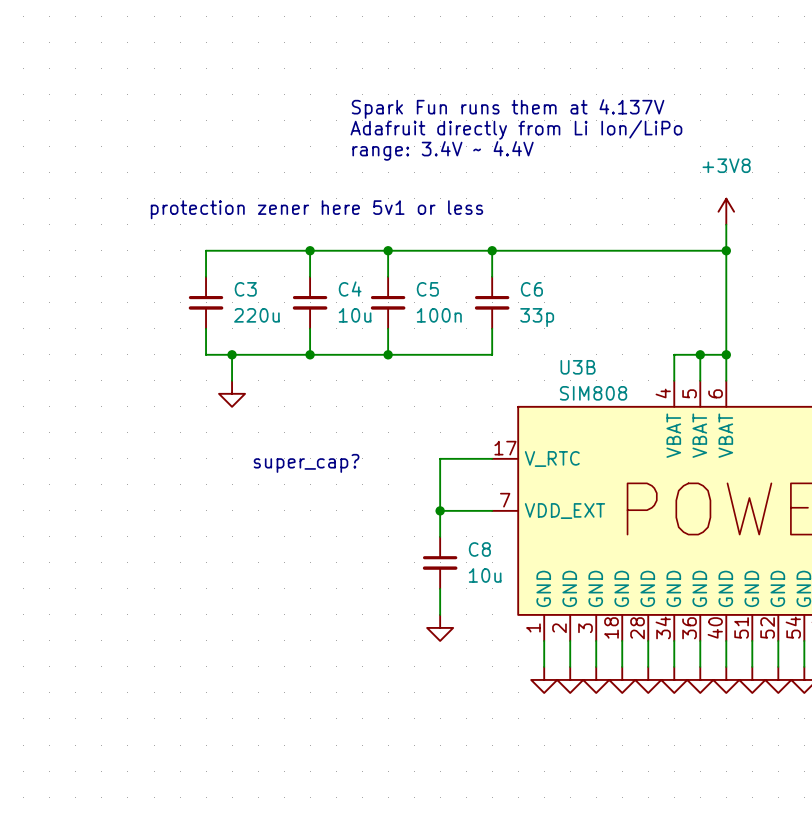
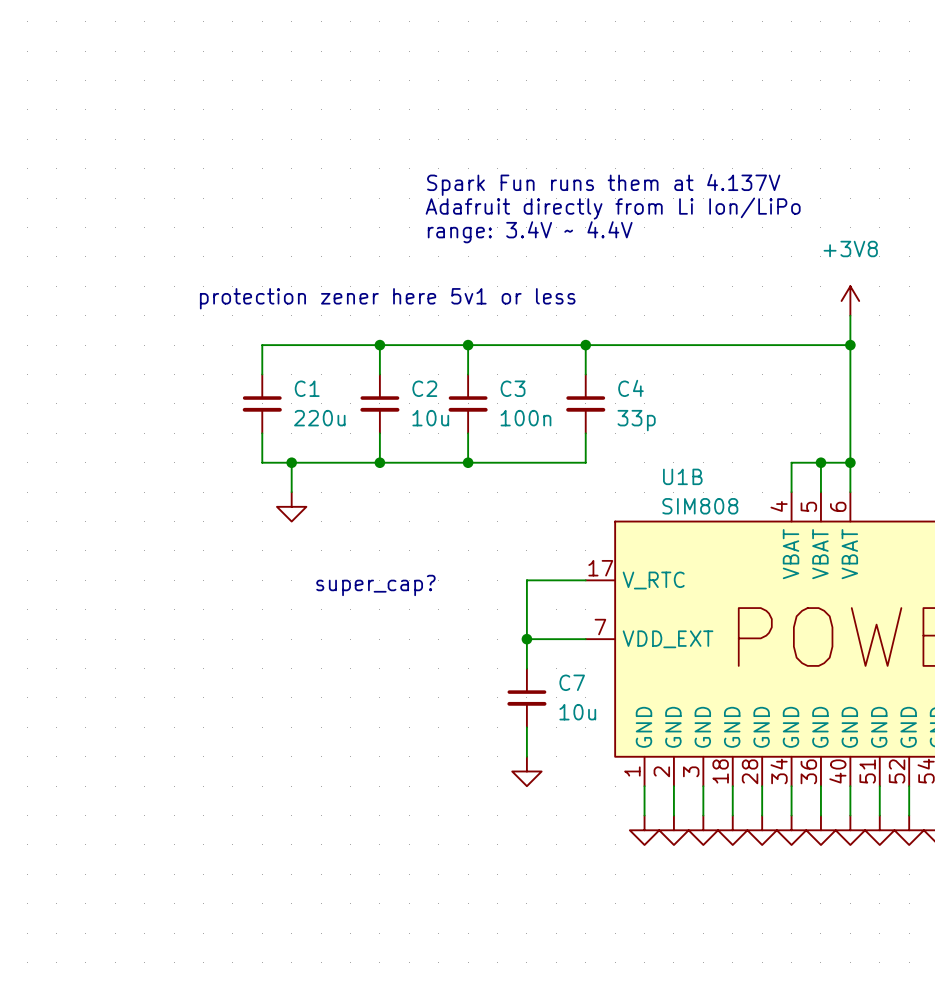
C3 name: C3 (245, 289) -> C1 (307, 388)
C4 name: C4 (350, 289) -> C2 (424, 388)
C5 name: C5 (427, 289) -> C3 (513, 388)
C6 name: C6 (531, 289) -> C4 (631, 388)
U3B name: U3B (578, 367) -> U1B (682, 476)
C8 name: C8 (479, 549) -> C7 (572, 682)

